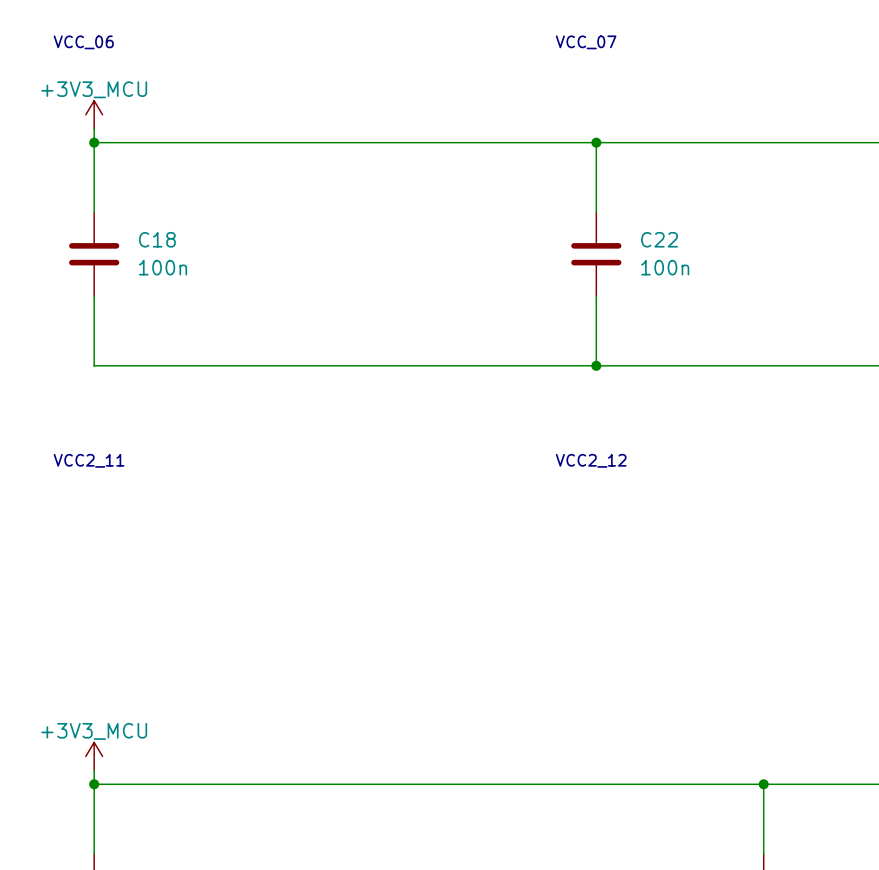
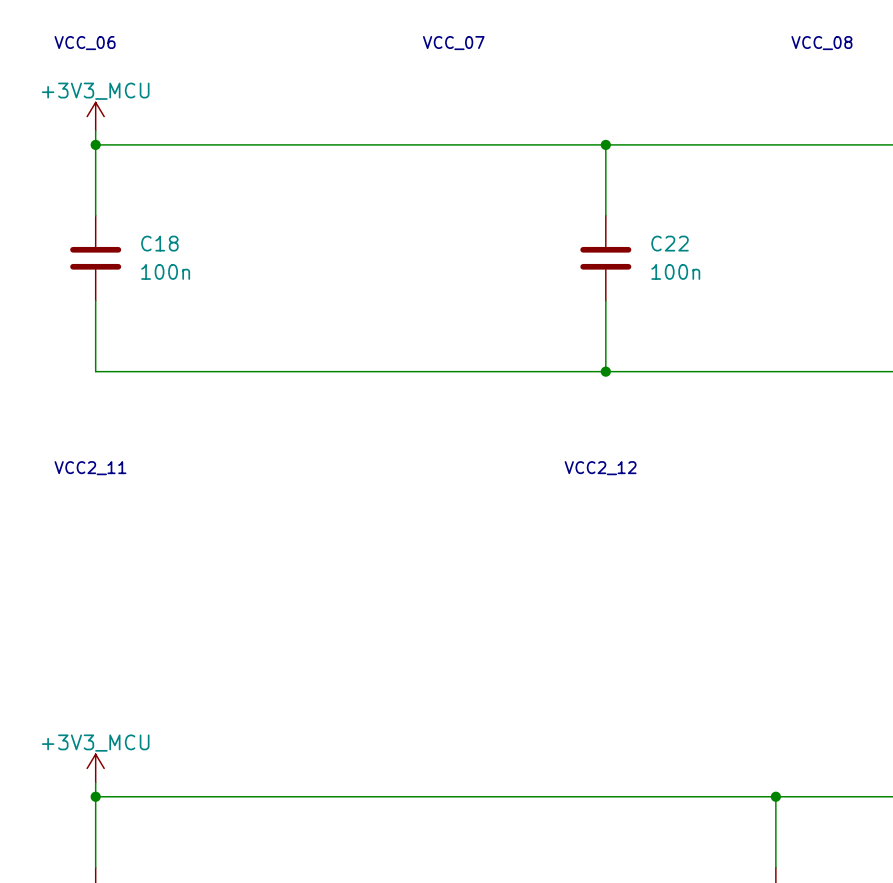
text position: VCC_07 (586, 42) -> VCC_07 (453, 43)
text: none -> VCC_08 (821, 43)

